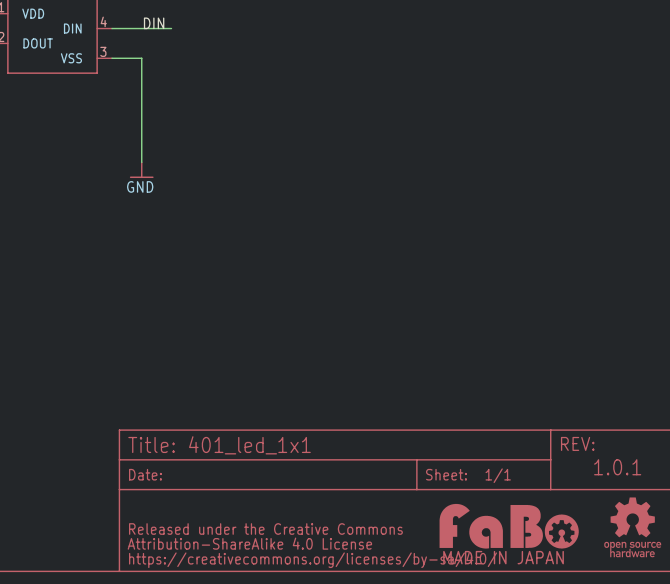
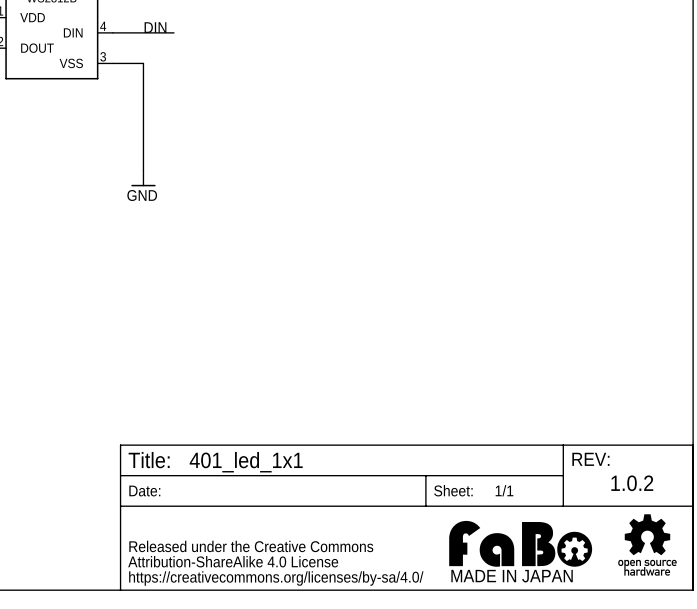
text: 1.0.1 (617, 467) -> 1.0.2 (632, 483)

